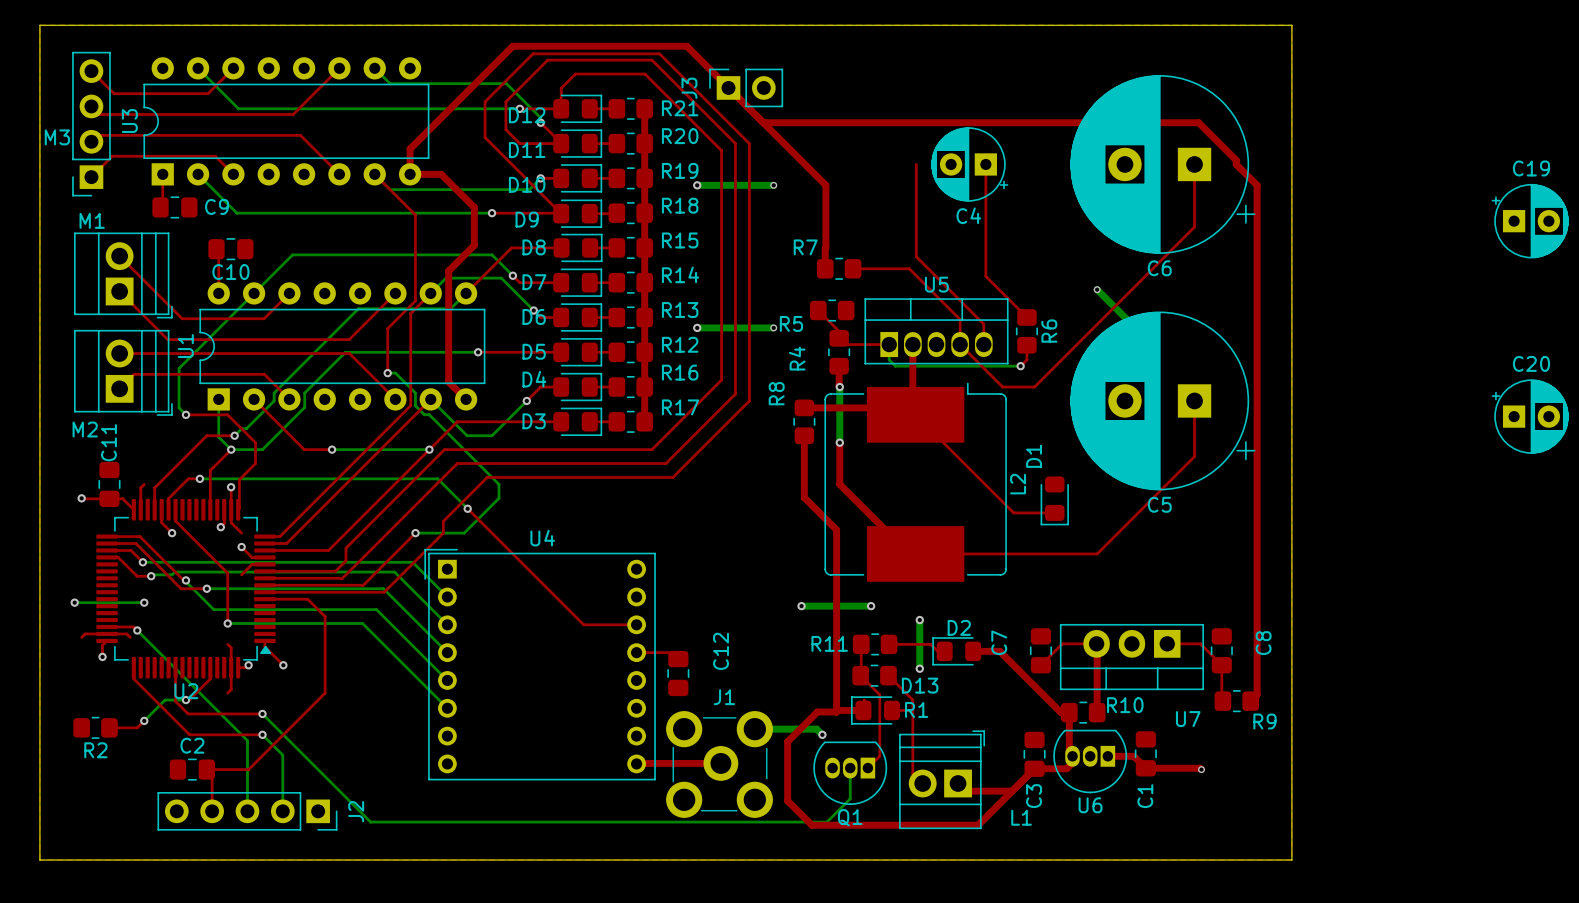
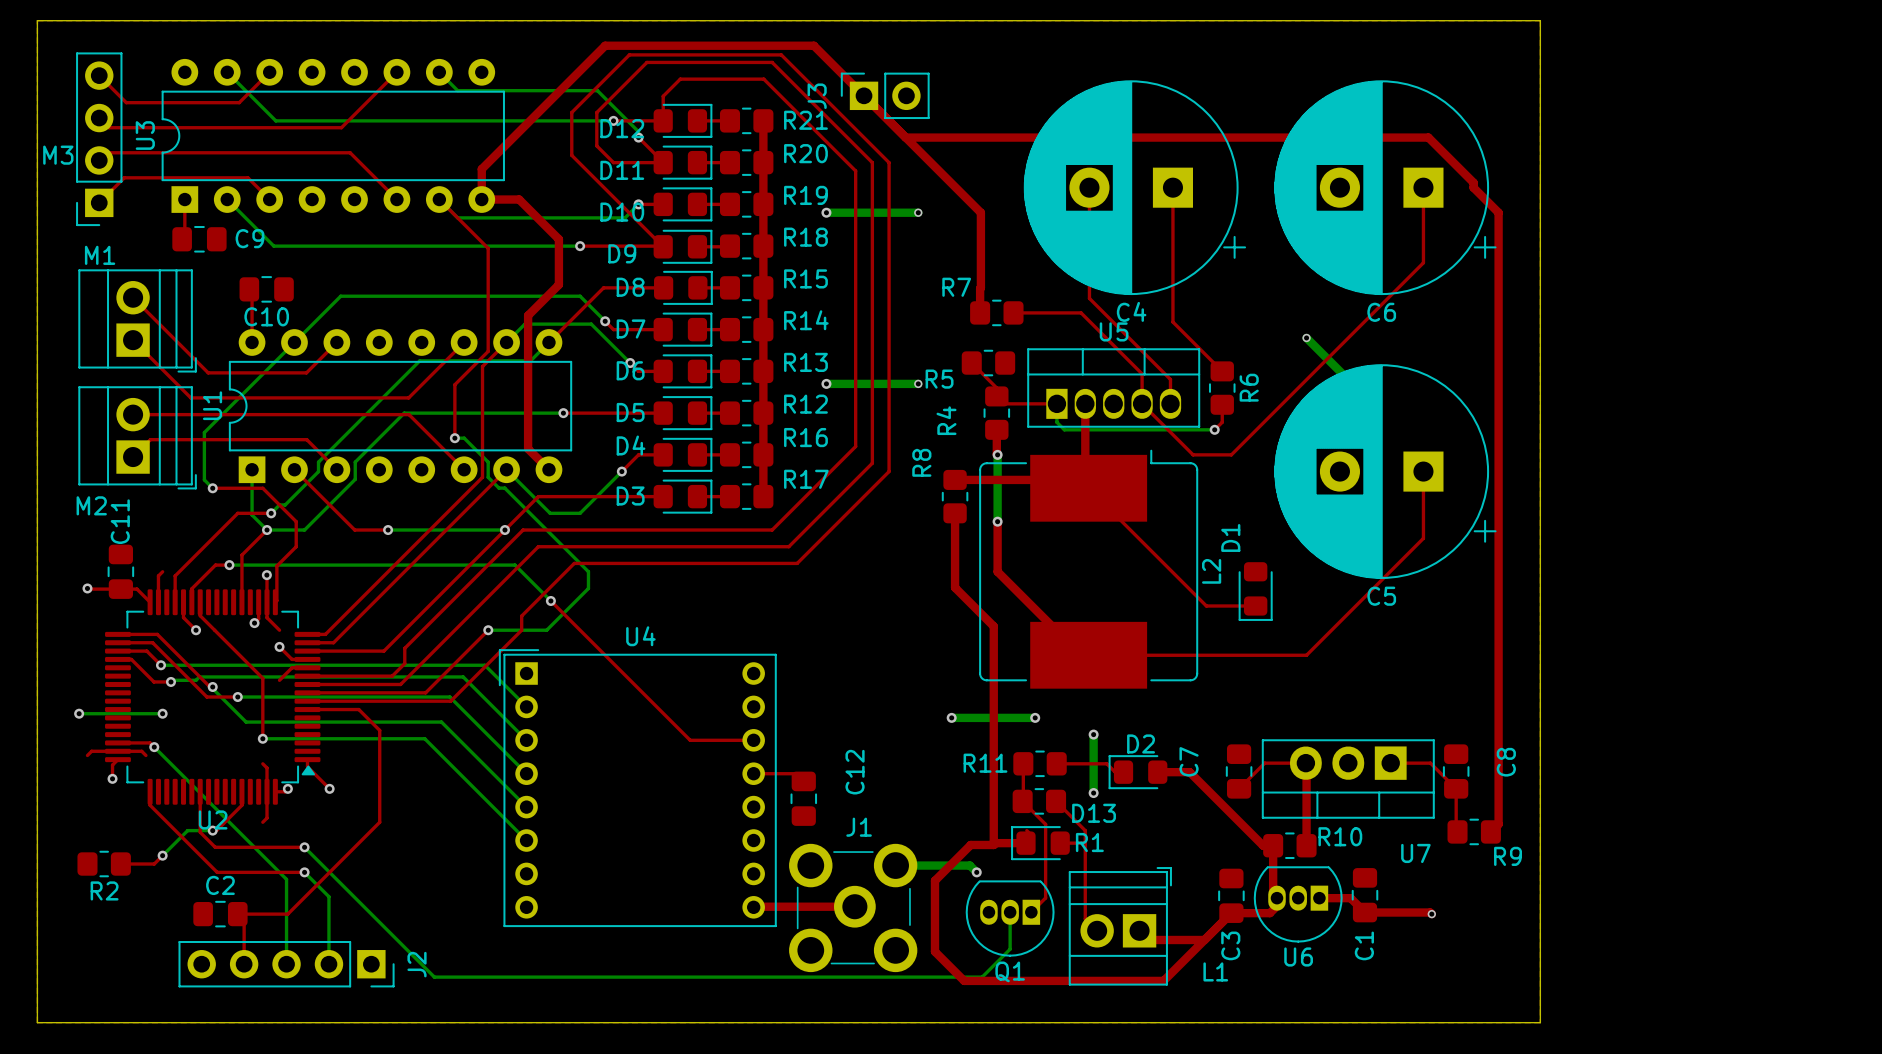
C4 footprint: [931, 127, 1009, 202] -> [1023, 80, 1247, 296]
C4 name position: C4 (968, 215) -> C4 (1131, 311)
C19: (1530, 221) -> none
C20: (1530, 416) -> none

